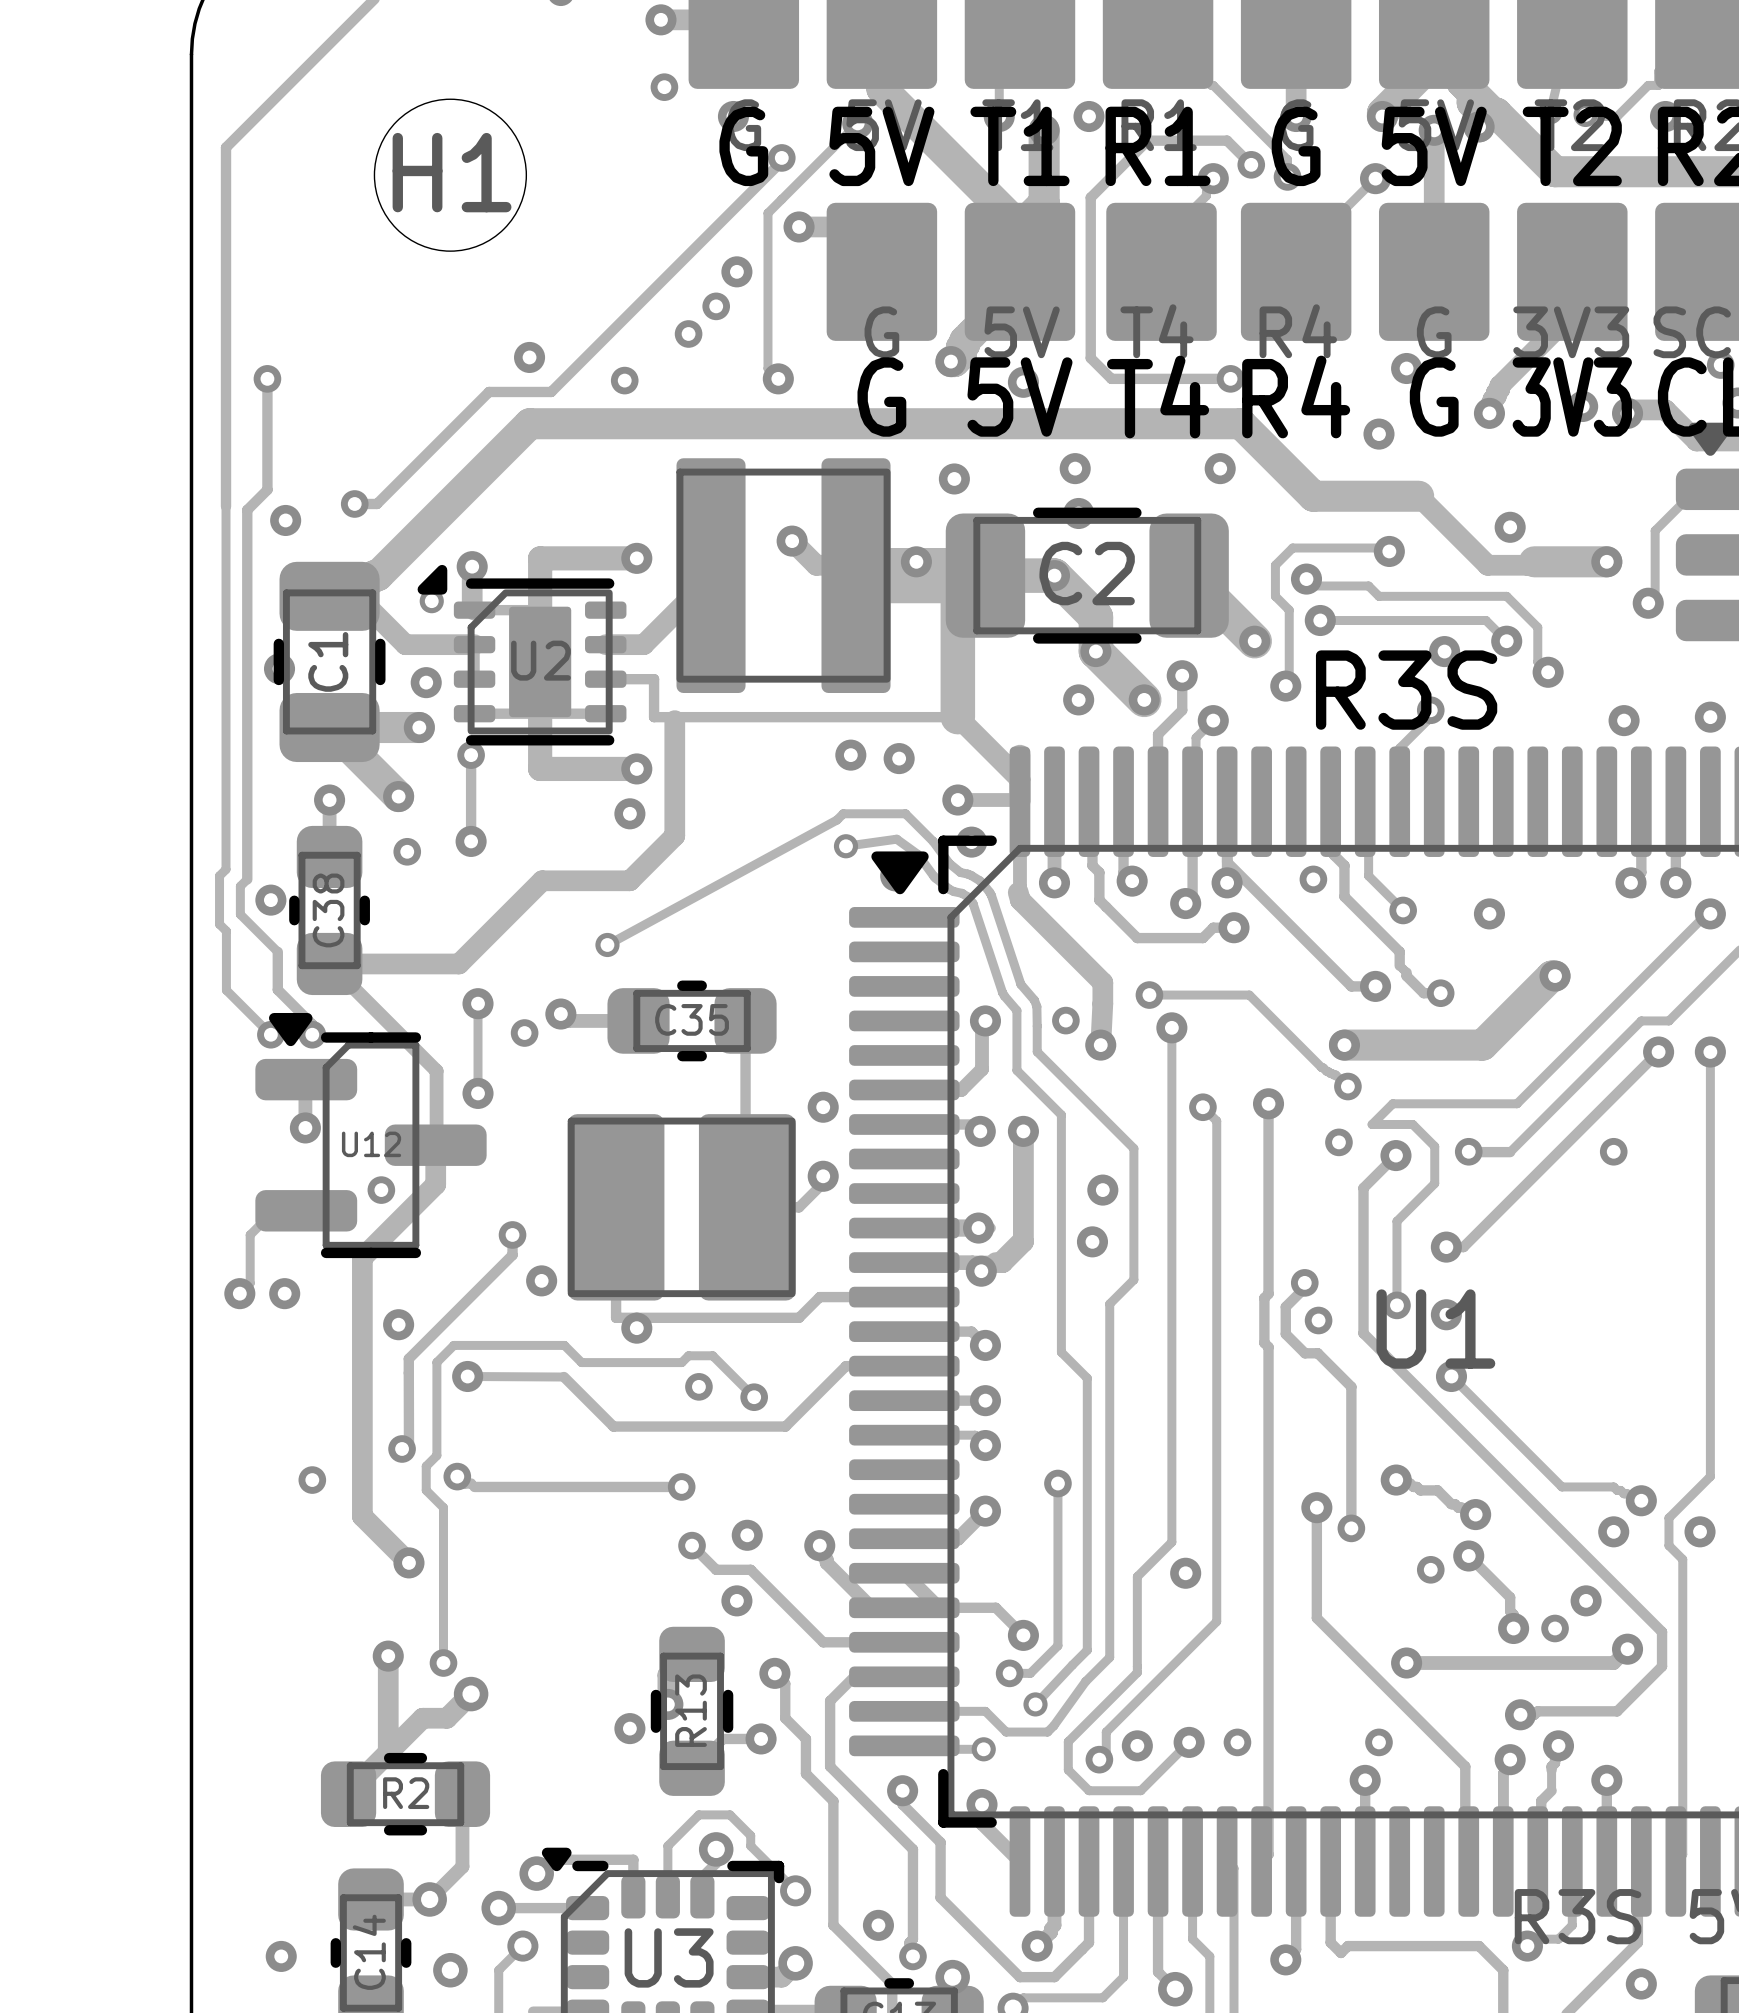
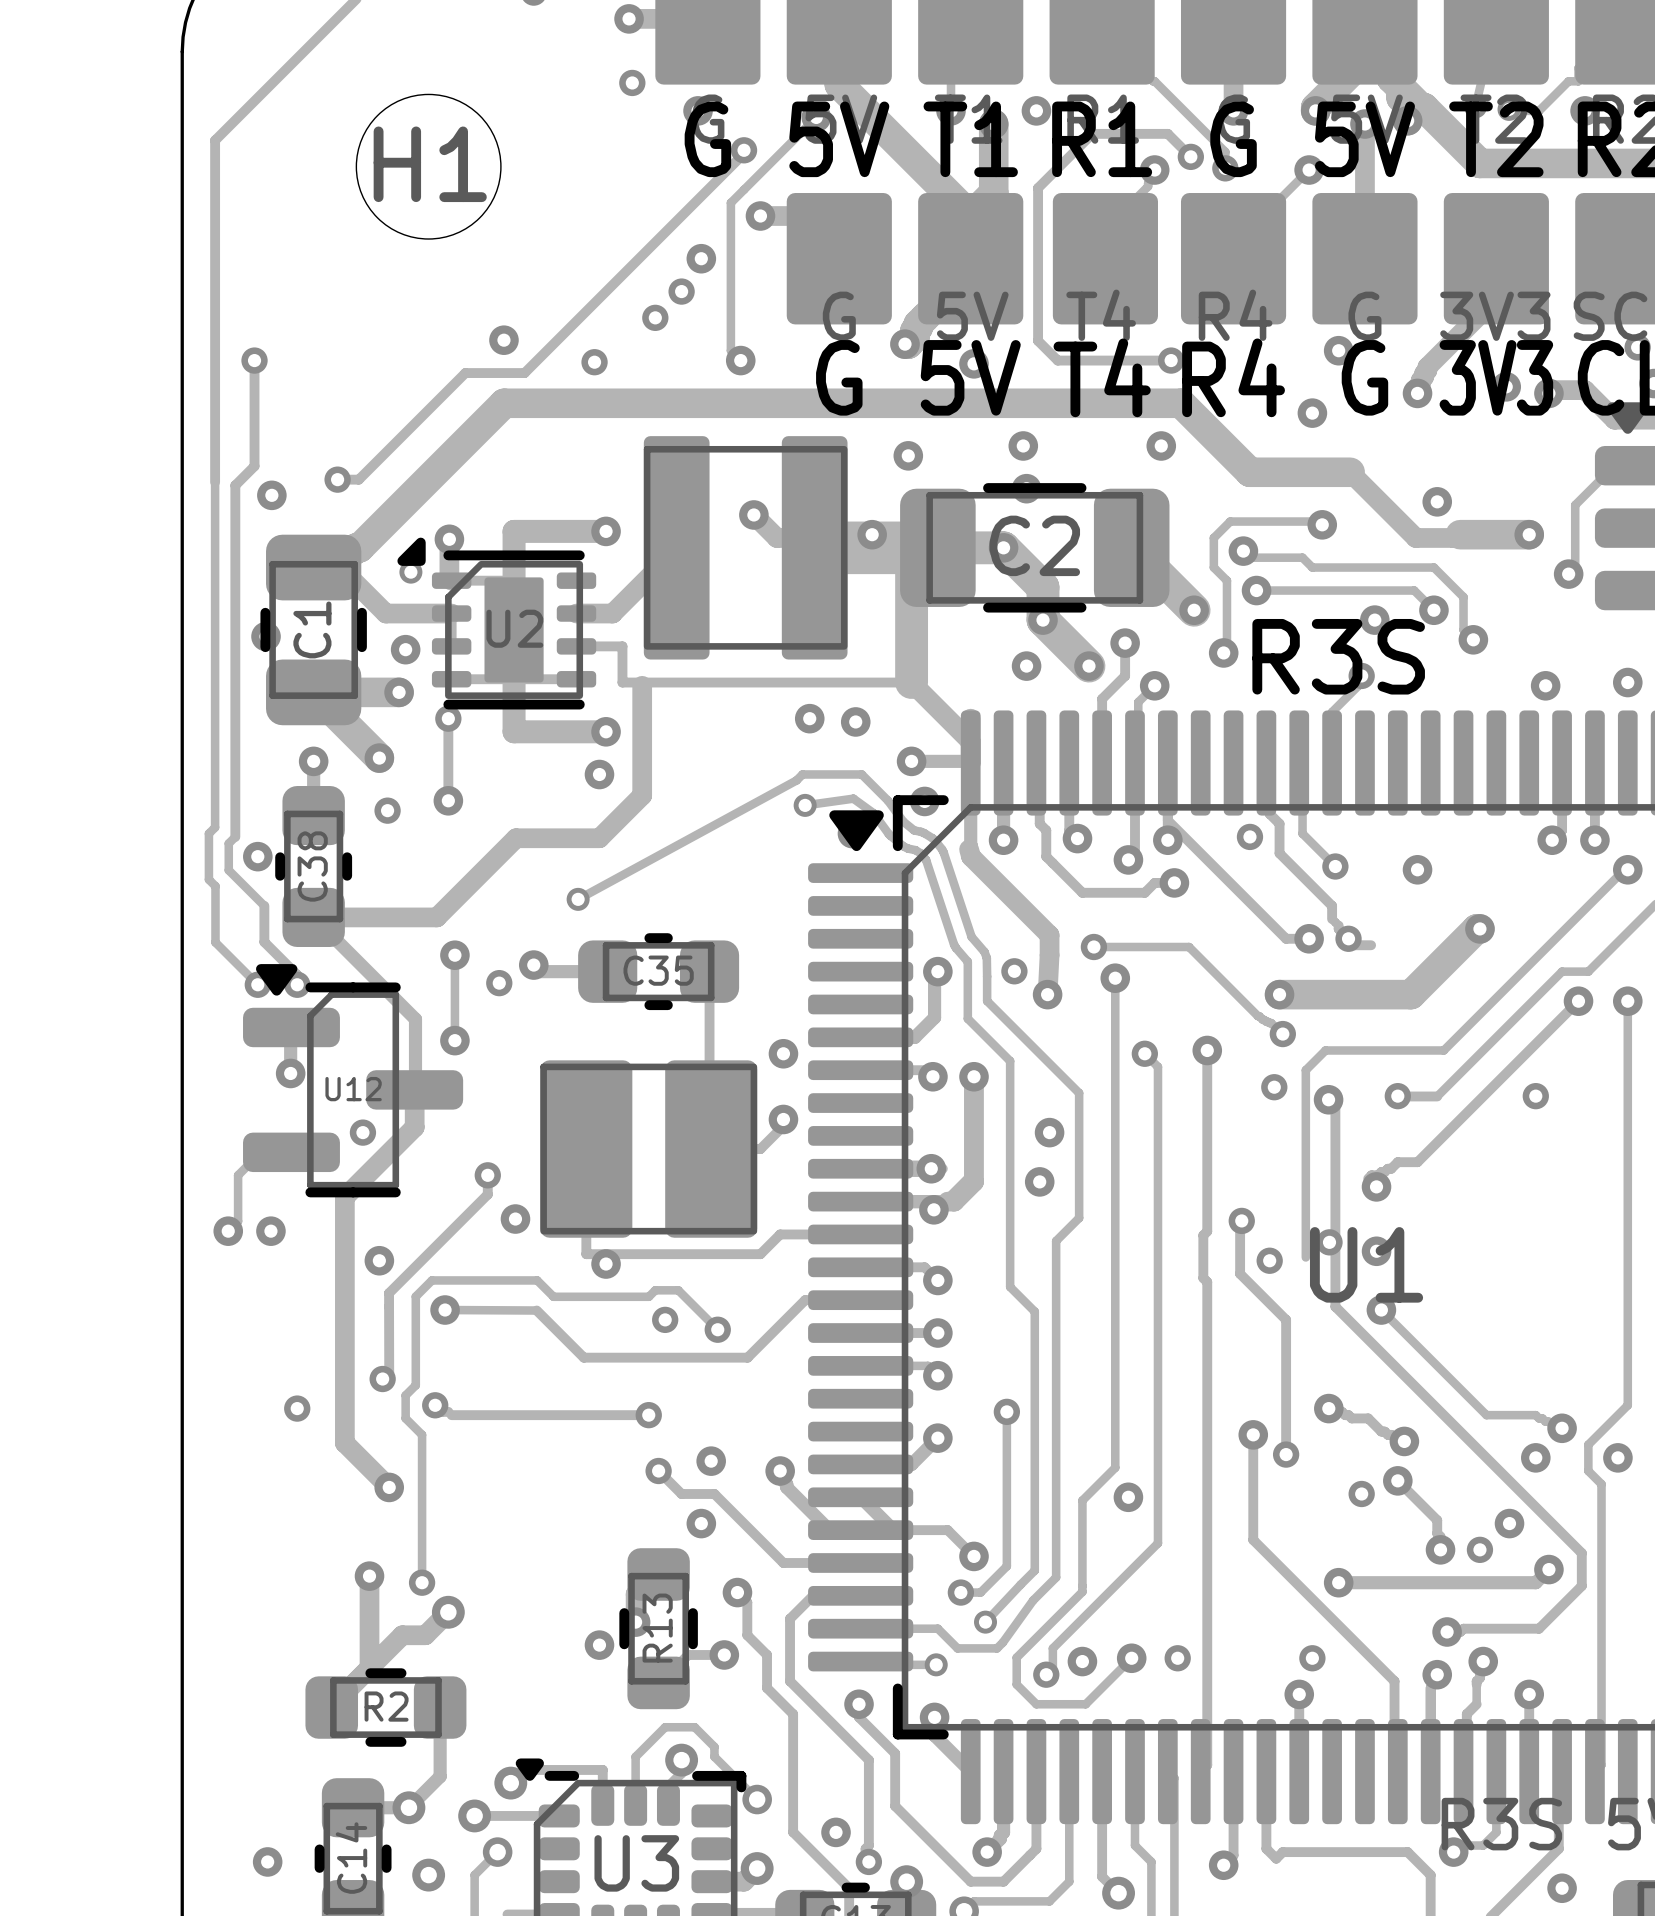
via position: (1440, 993) -> (1348, 938)
track: (1372, 1124) (1412, 1124) (1434, 1146) (1434, 1183) (1396, 1221) (1396, 1305) -> (1305, 1070) (1305, 1257)
track: (1395, 1155) (1363, 1188) (1363, 1333) (1403, 1373) -> (1335, 1099) (1335, 1306)
track: (1489, 1221) (1463, 1247) (1446, 1247) -> (1417, 1162) (1397, 1162) (1391, 1168) (1378, 1175) (1371, 1175) (1368, 1178)
track: (1304, 1282) (1304, 1287) (1285, 1306) (1285, 1334) (1304, 1353) (1317, 1353) -> (1240, 1224) (1240, 1273) (1254, 1287)
via position: (1318, 1320) -> (1269, 1260)

